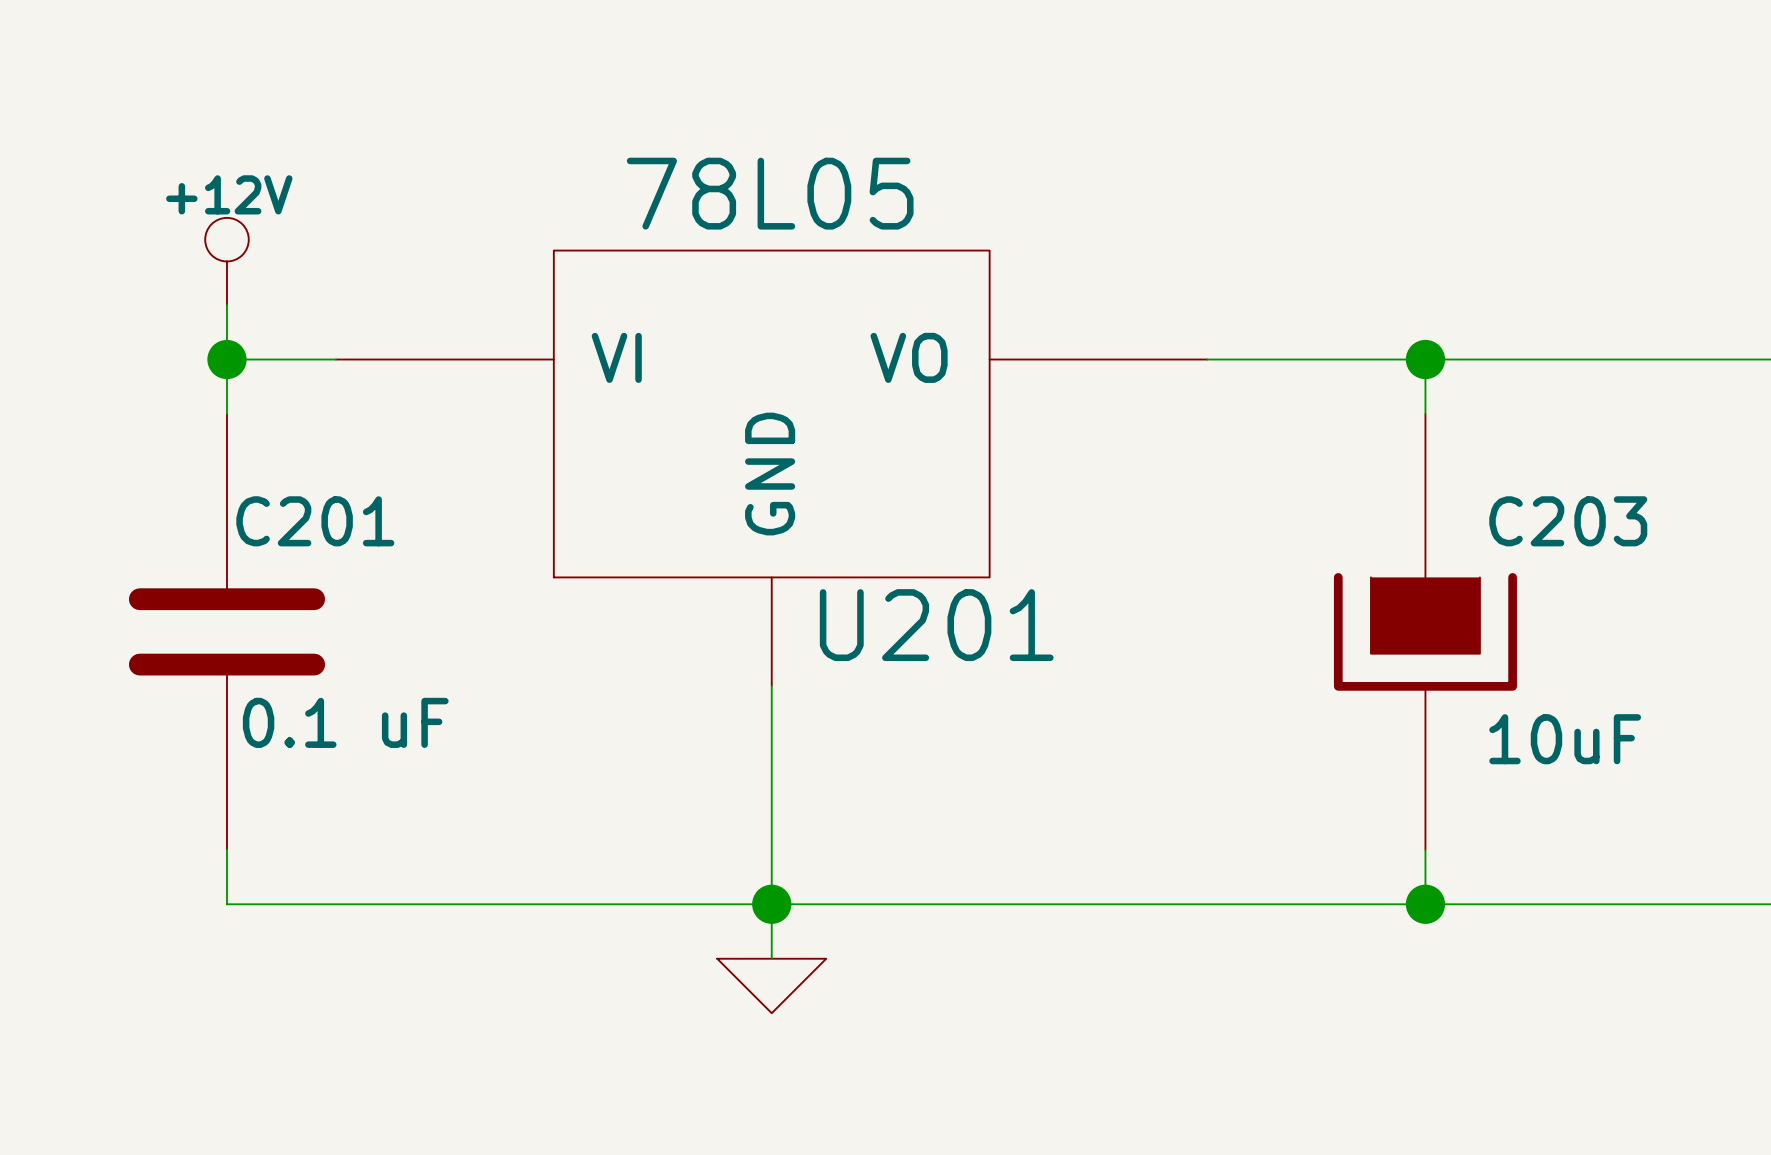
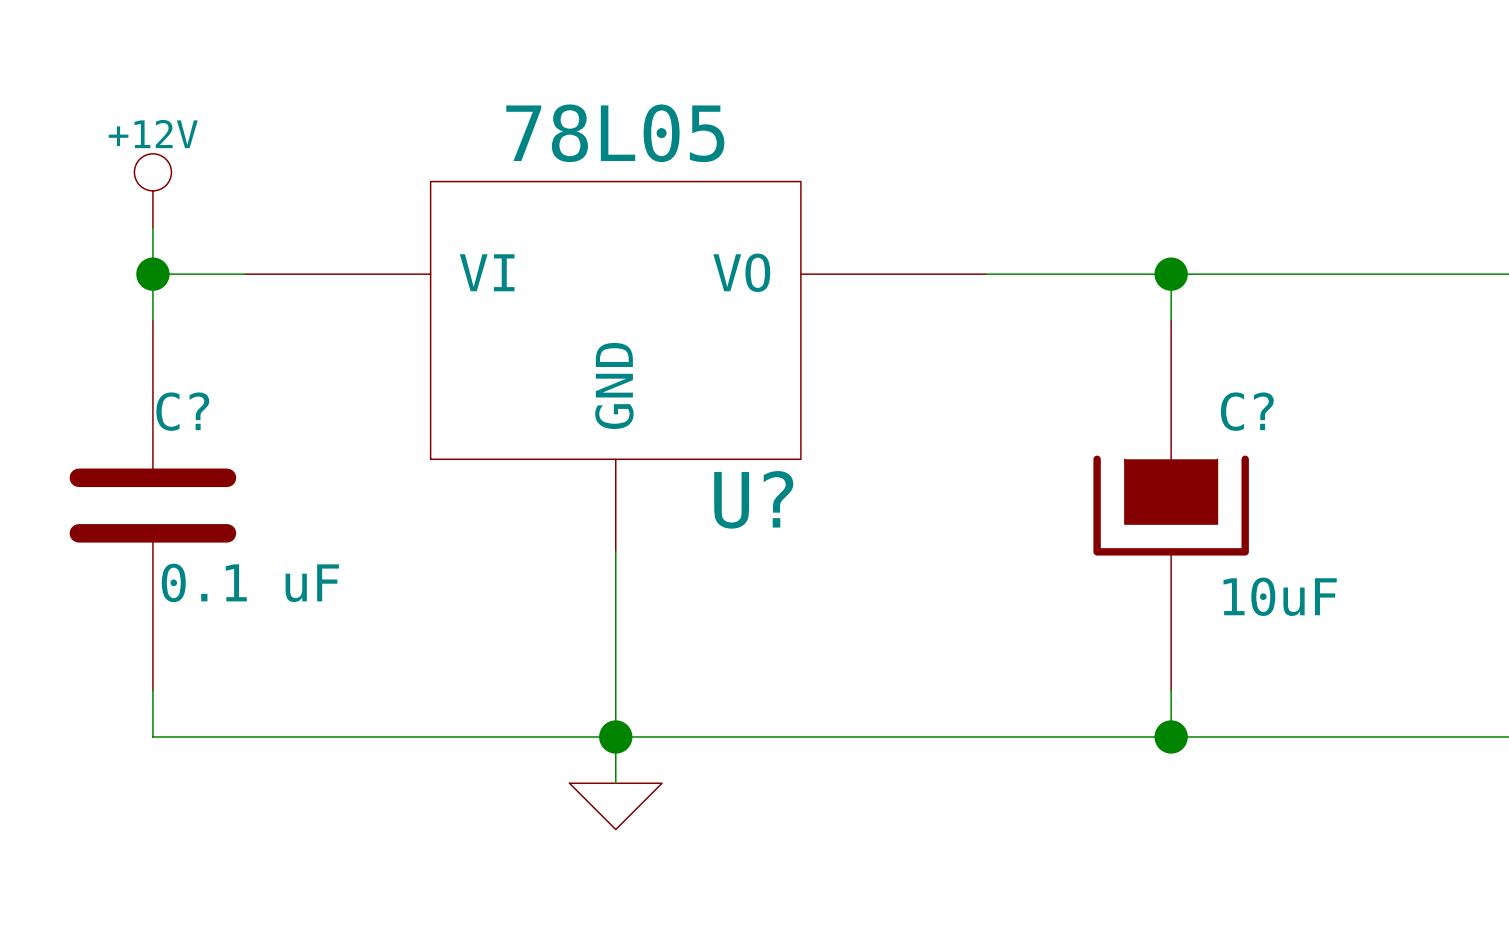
C201 name: C201 (315, 521) -> C? (182, 411)
C203 name: C203 (1568, 521) -> C? (1247, 411)
U201 name: U201 (936, 625) -> U? (753, 499)

